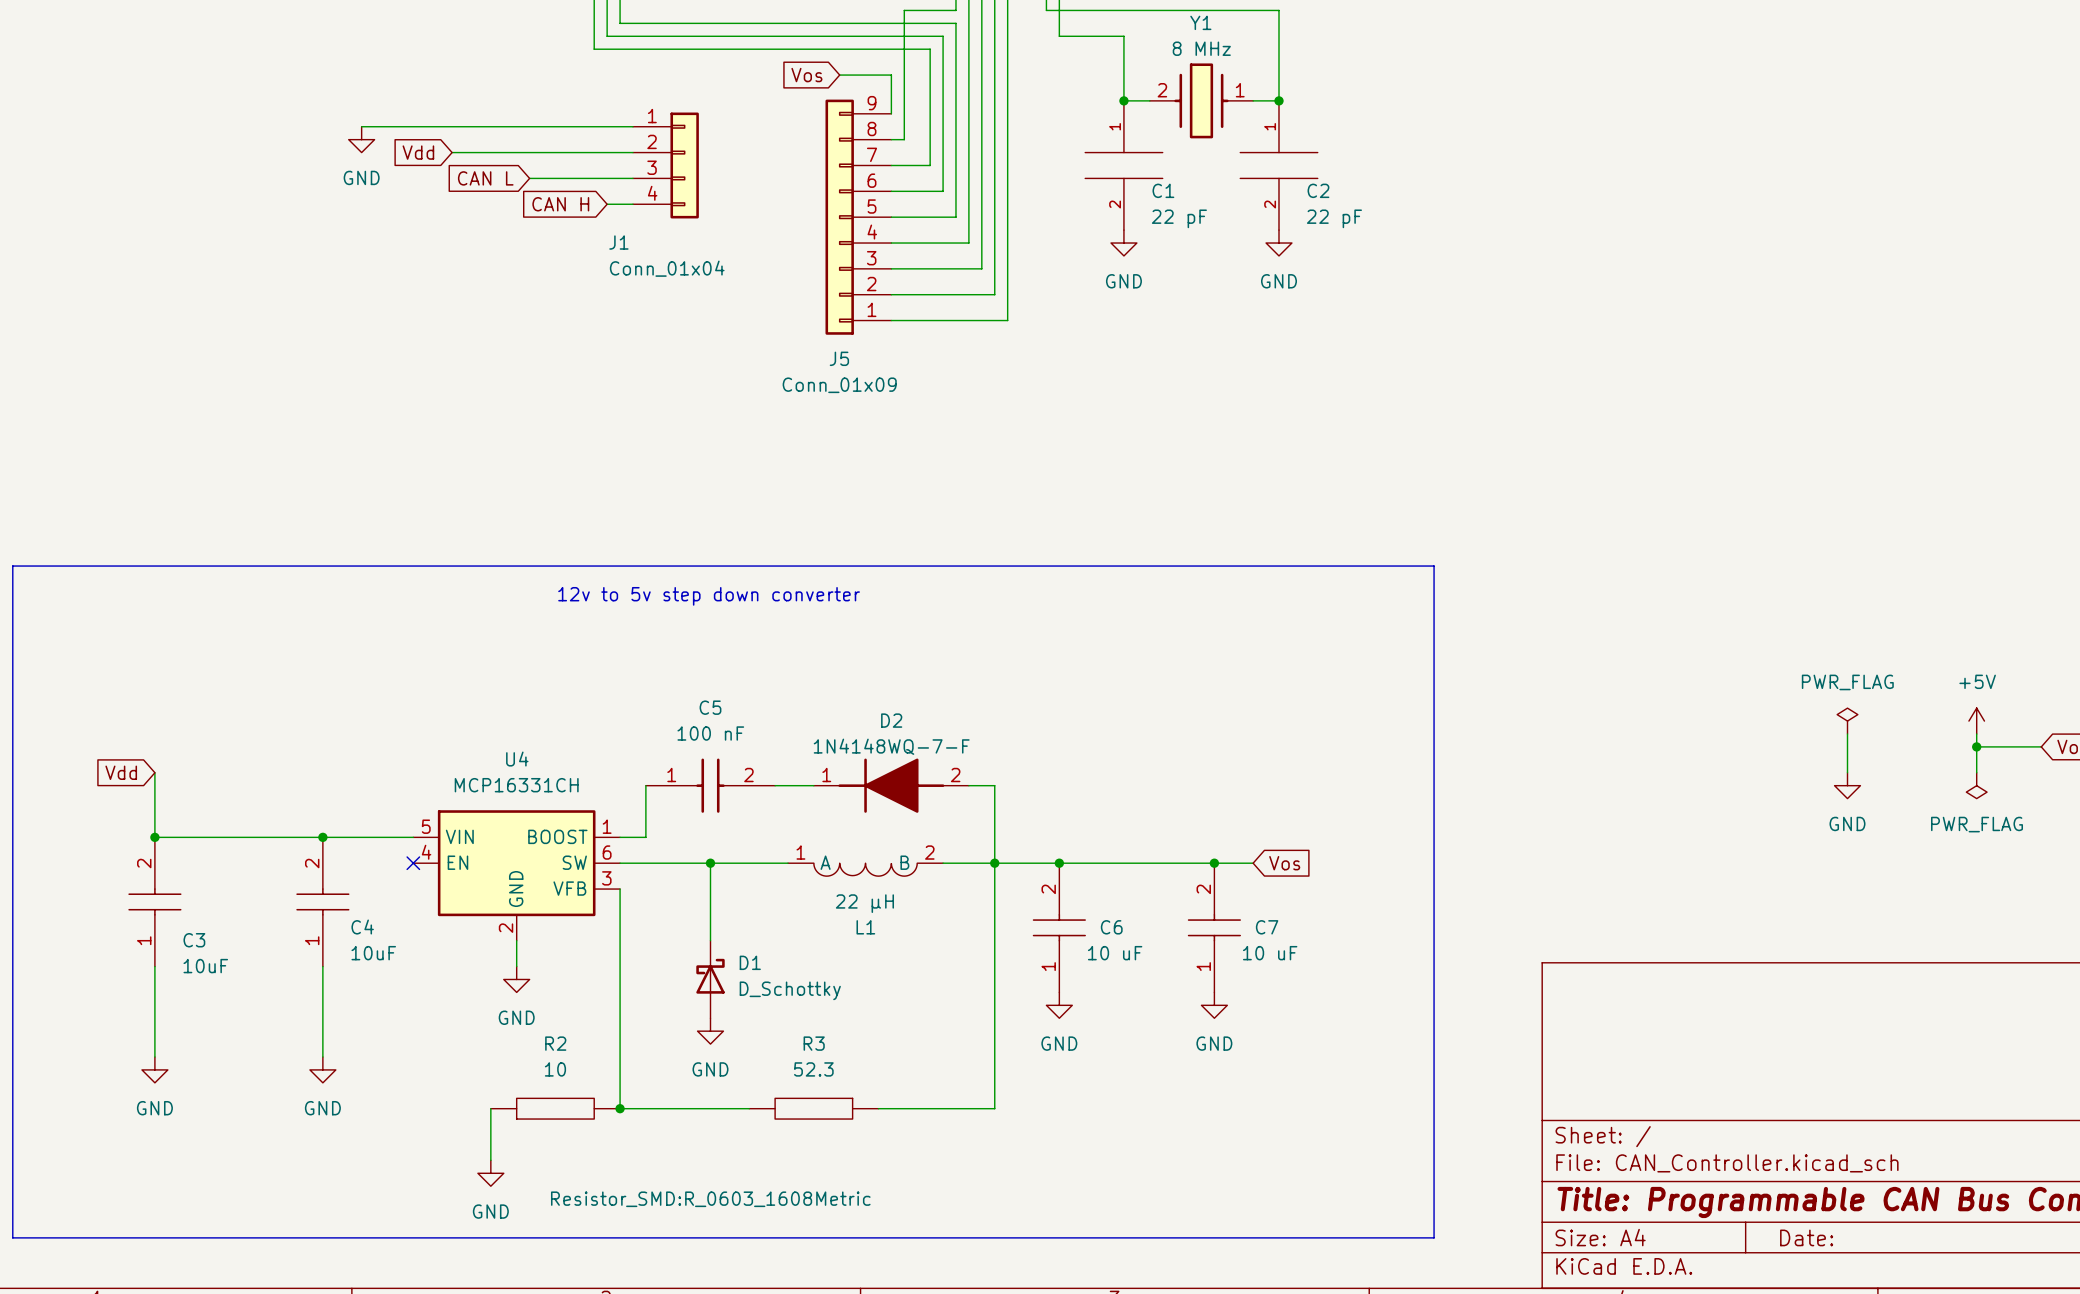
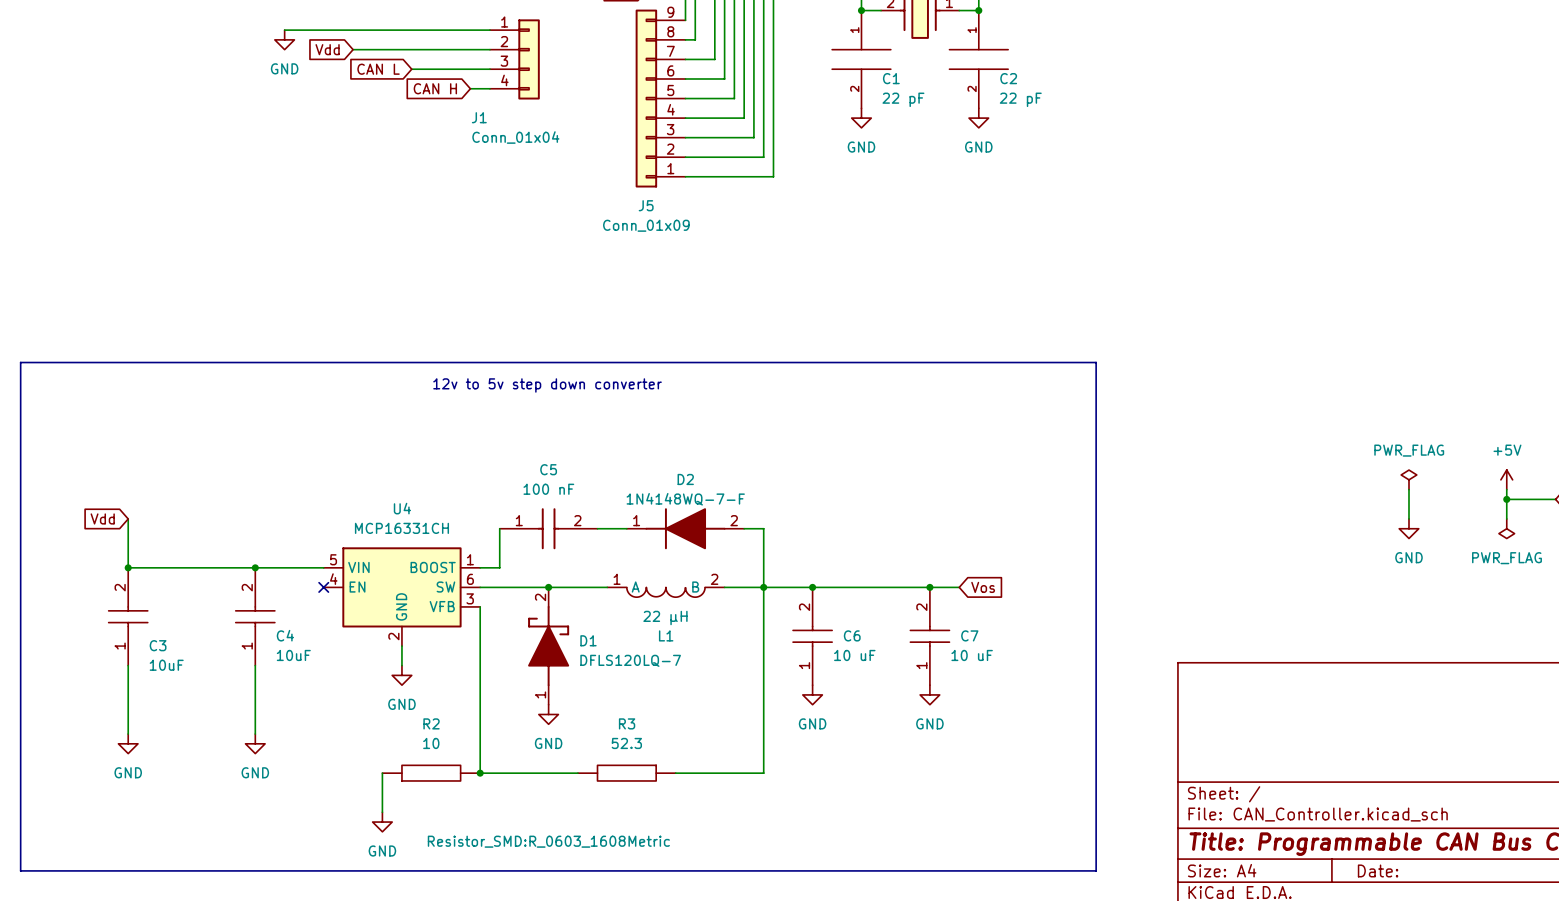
D1 symbol: [696, 940, 725, 1019] -> [528, 587, 570, 705]
D1 value: D_Schottky (790, 990) -> DFLS120LQ-7 (630, 660)

